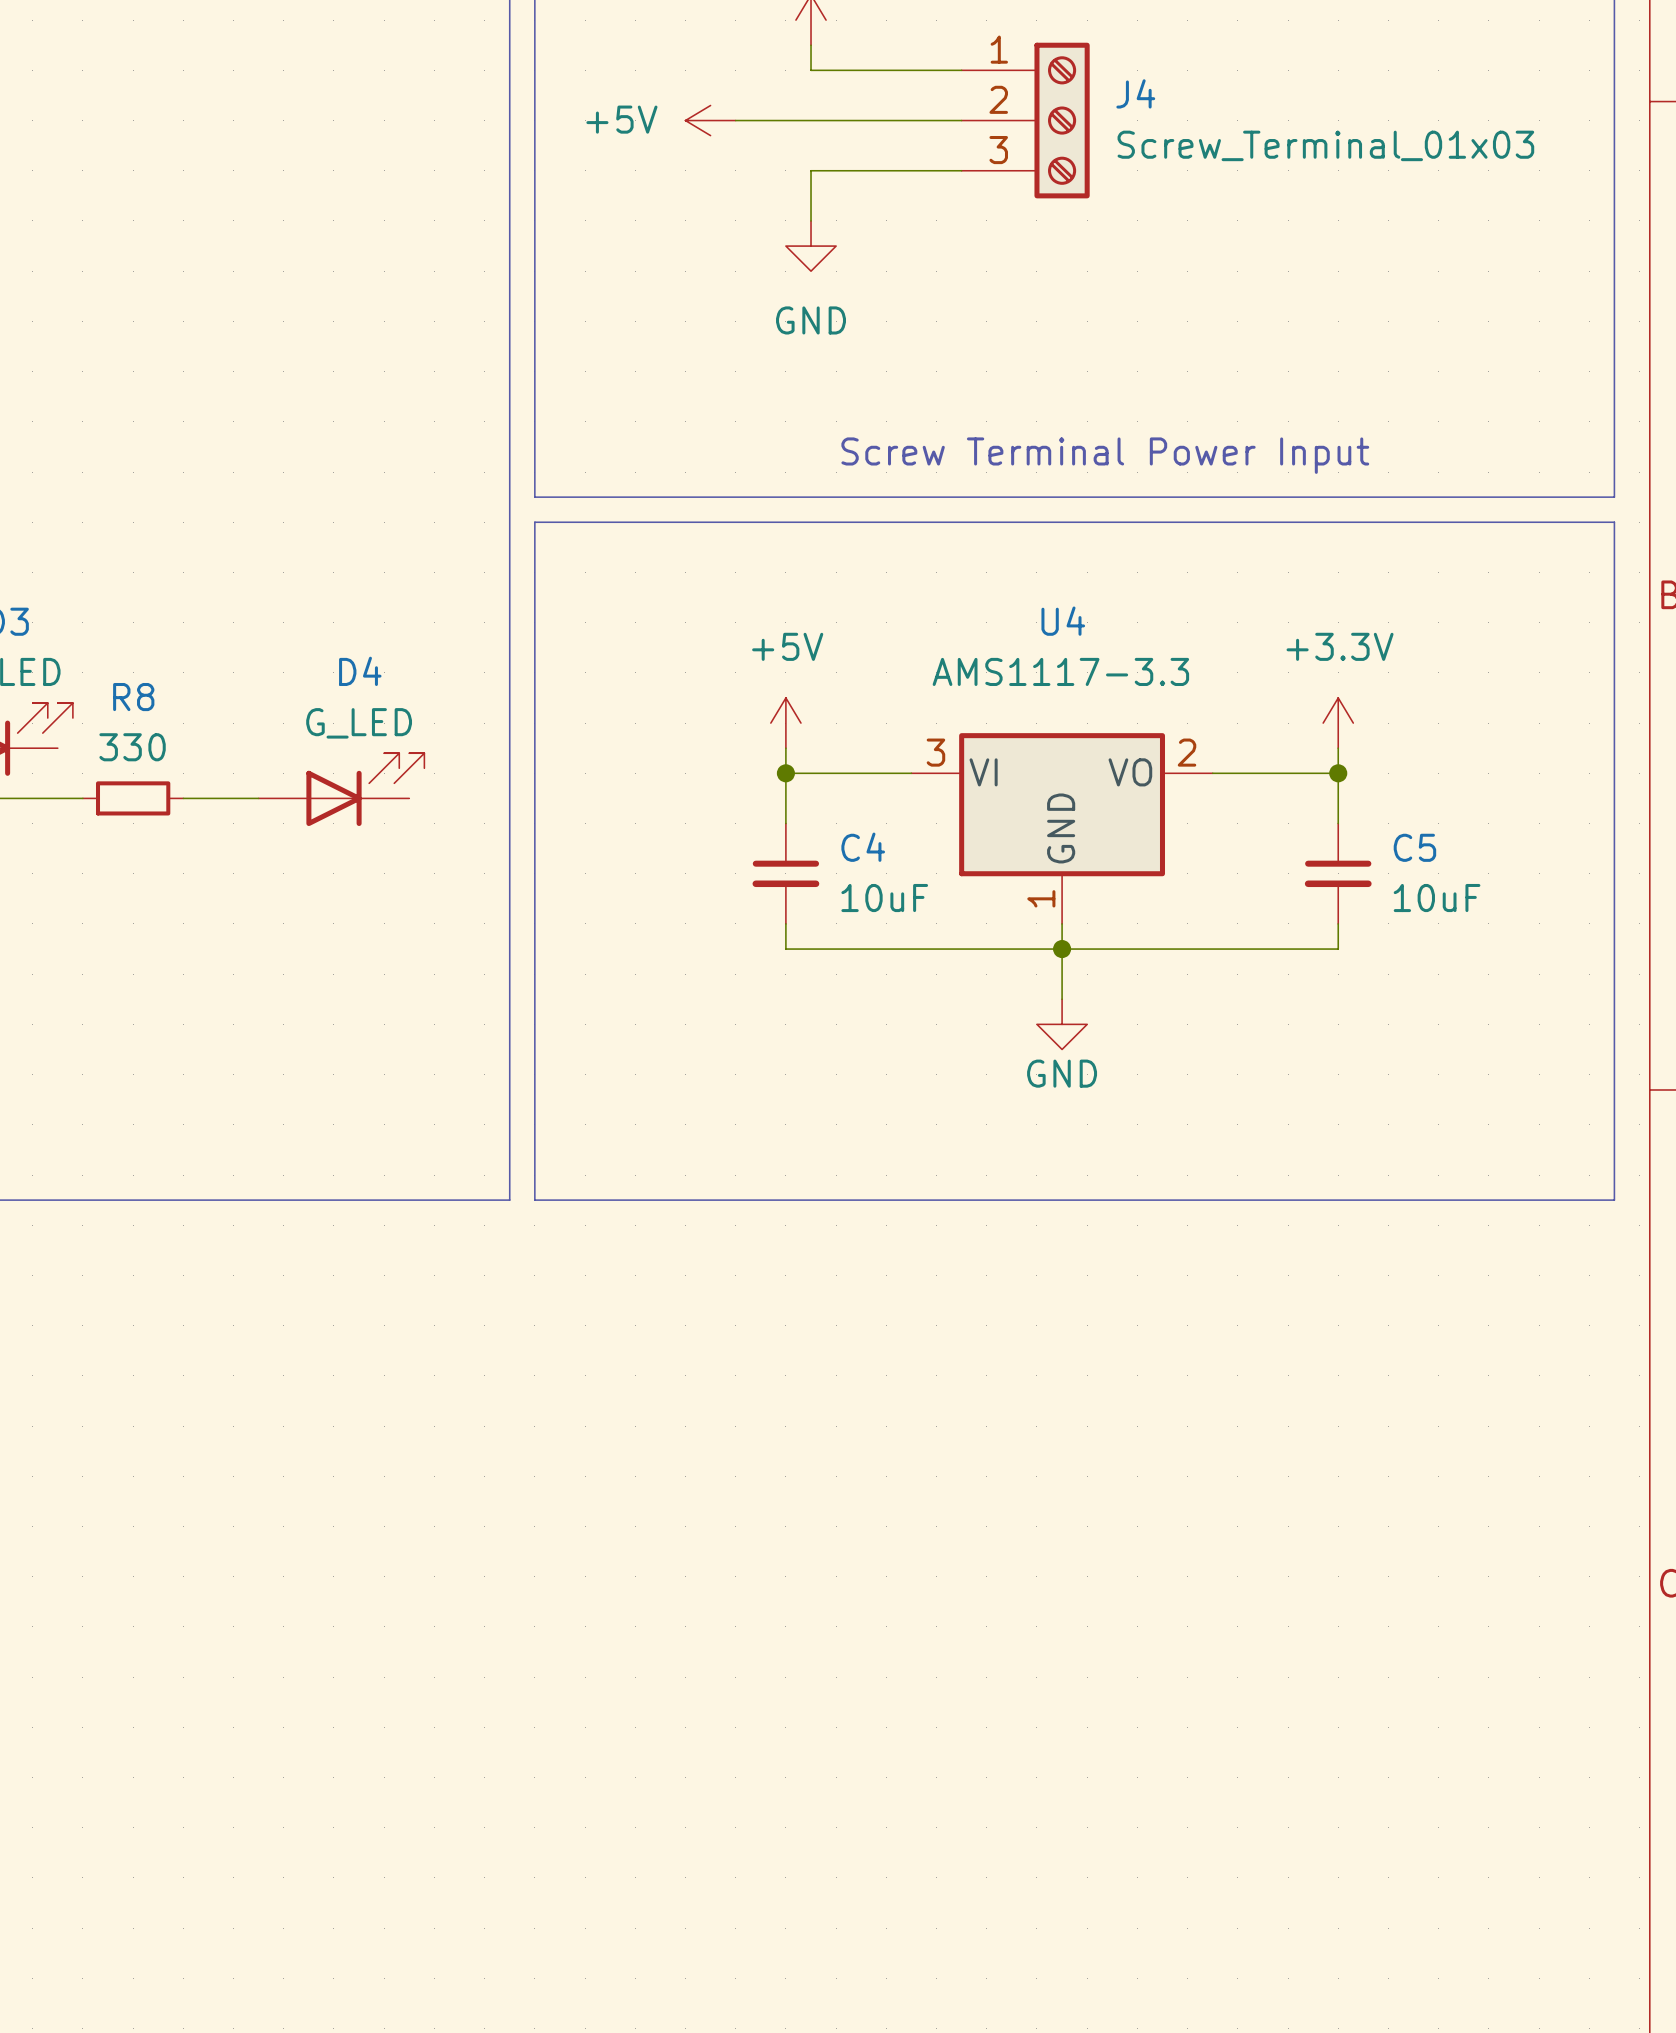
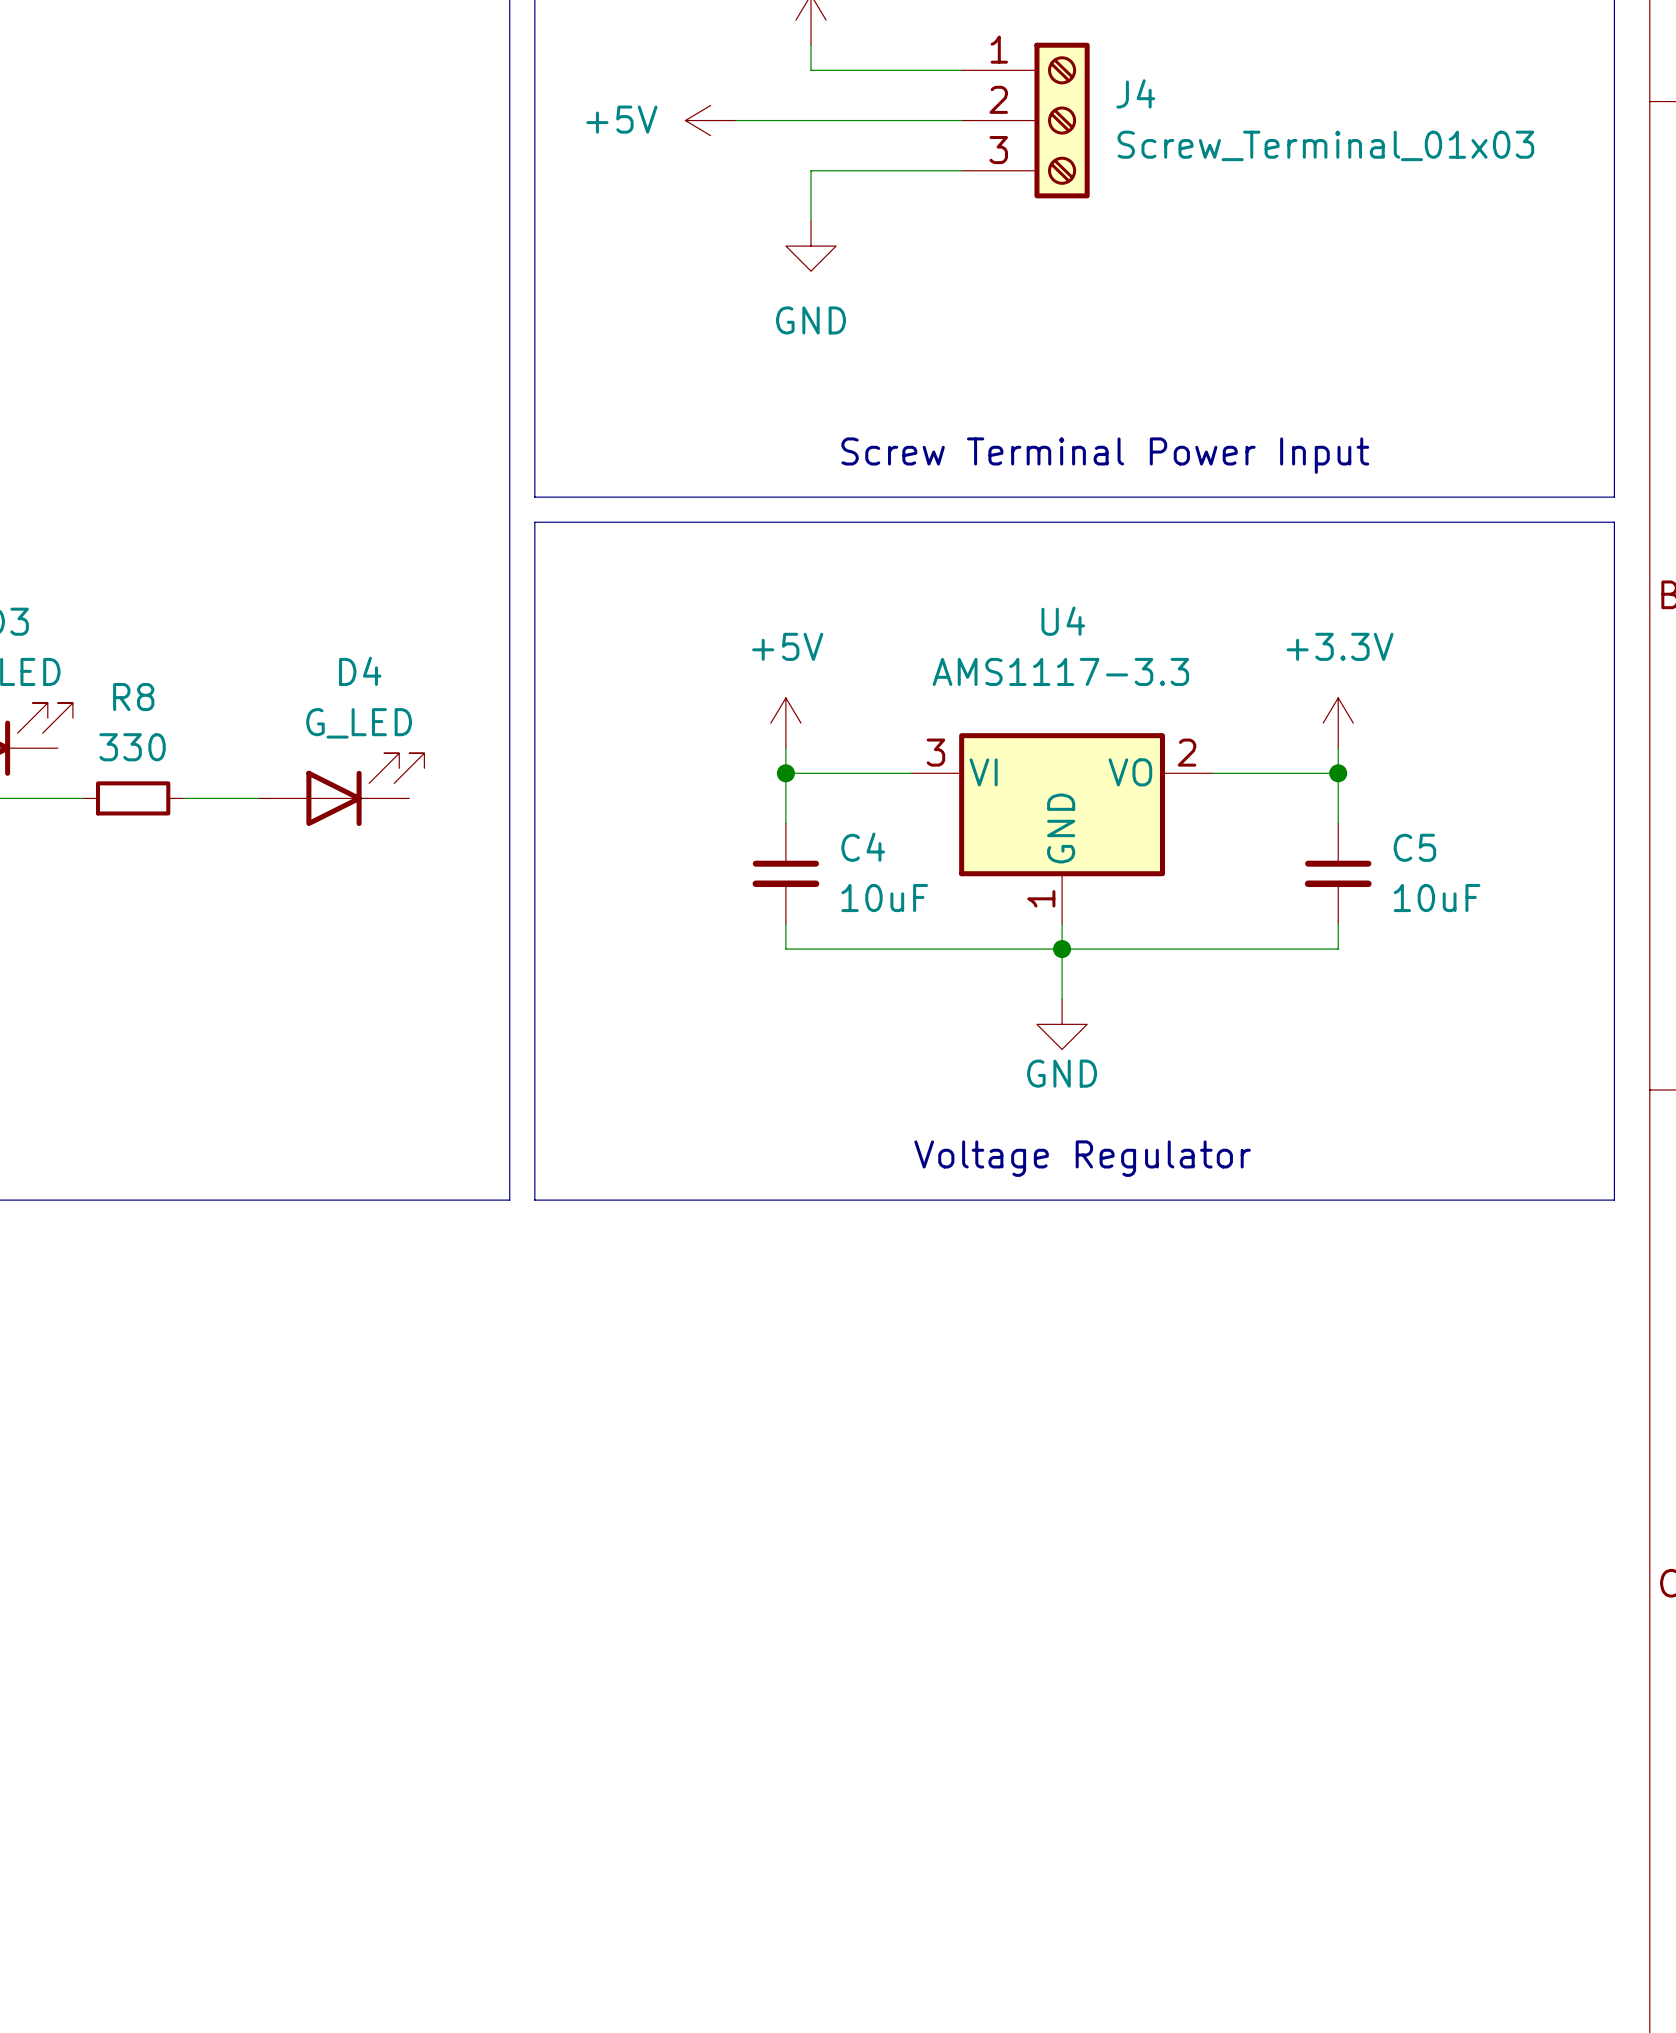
text: none -> Voltage Regulator (1082, 1158)

